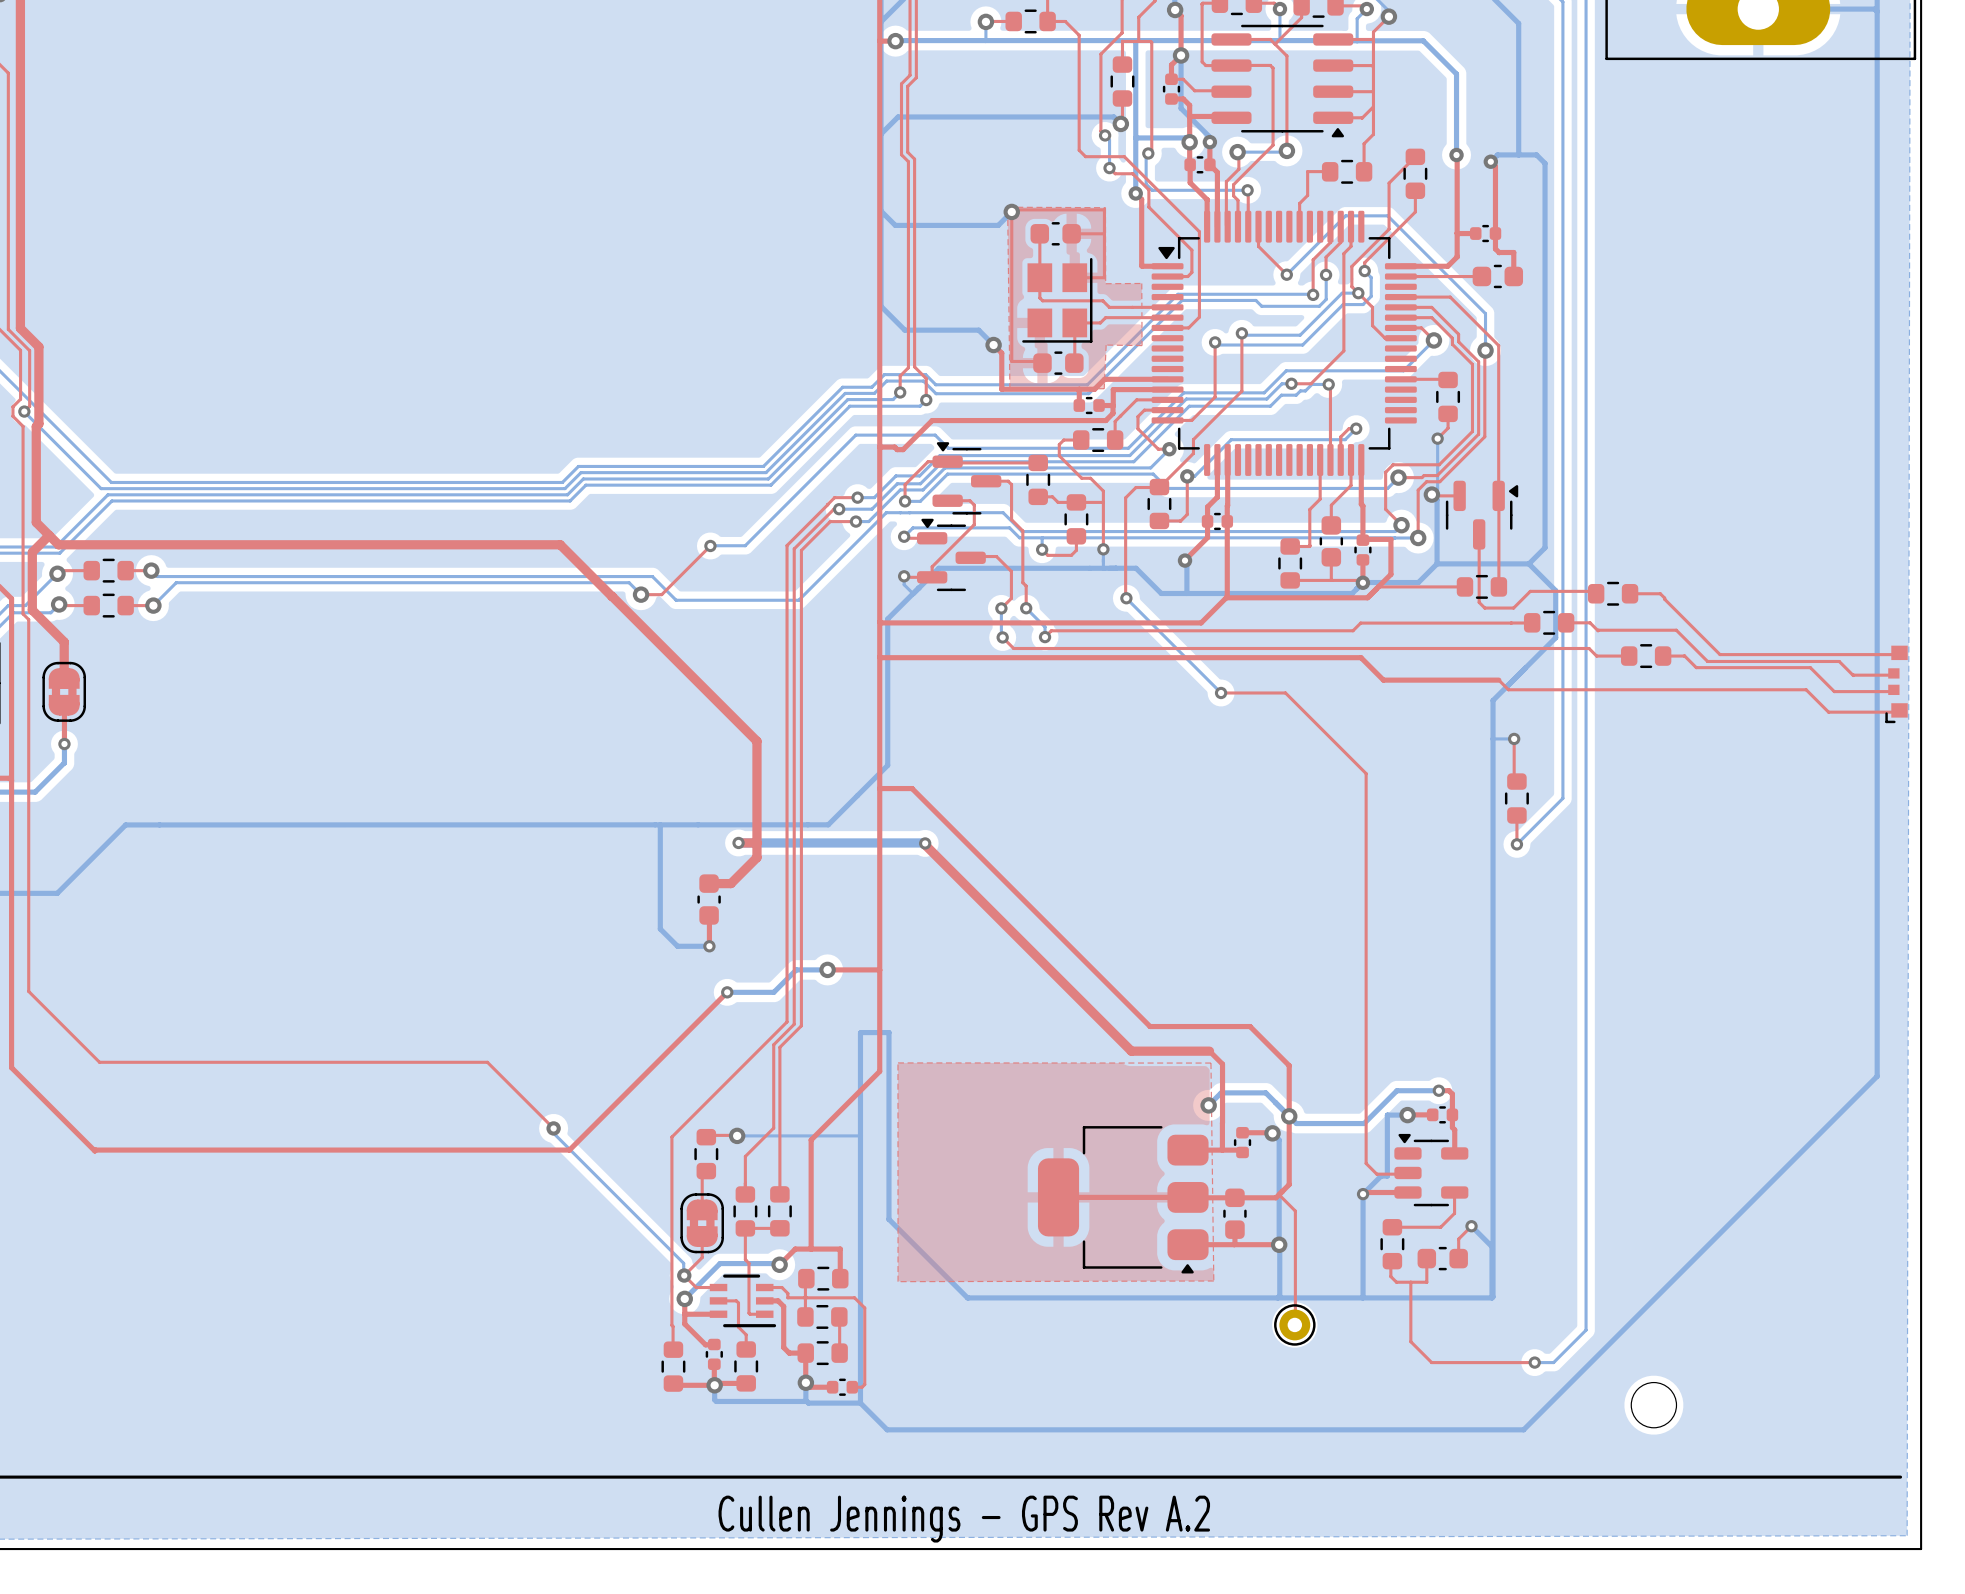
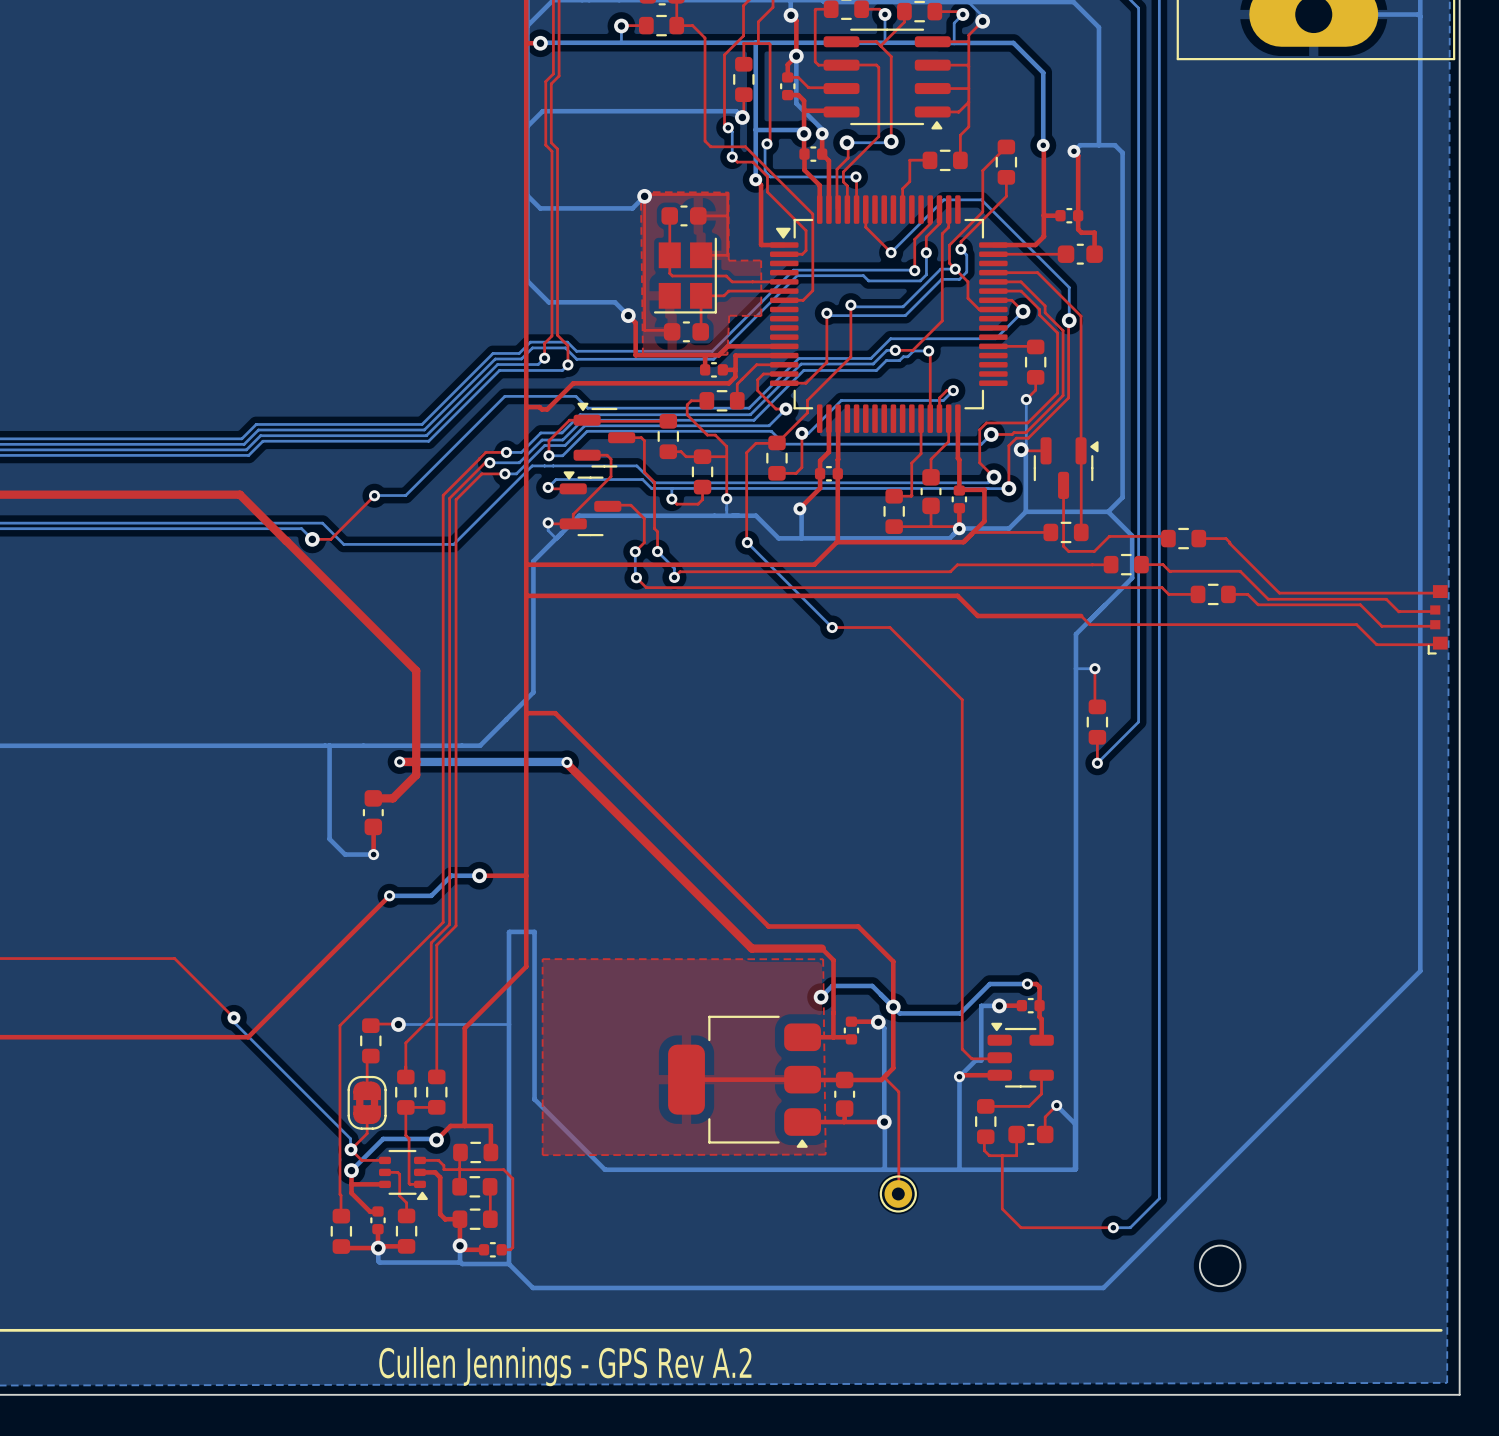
part footprint: [709, 1274, 777, 1328] -> [378, 1149, 428, 1201]

